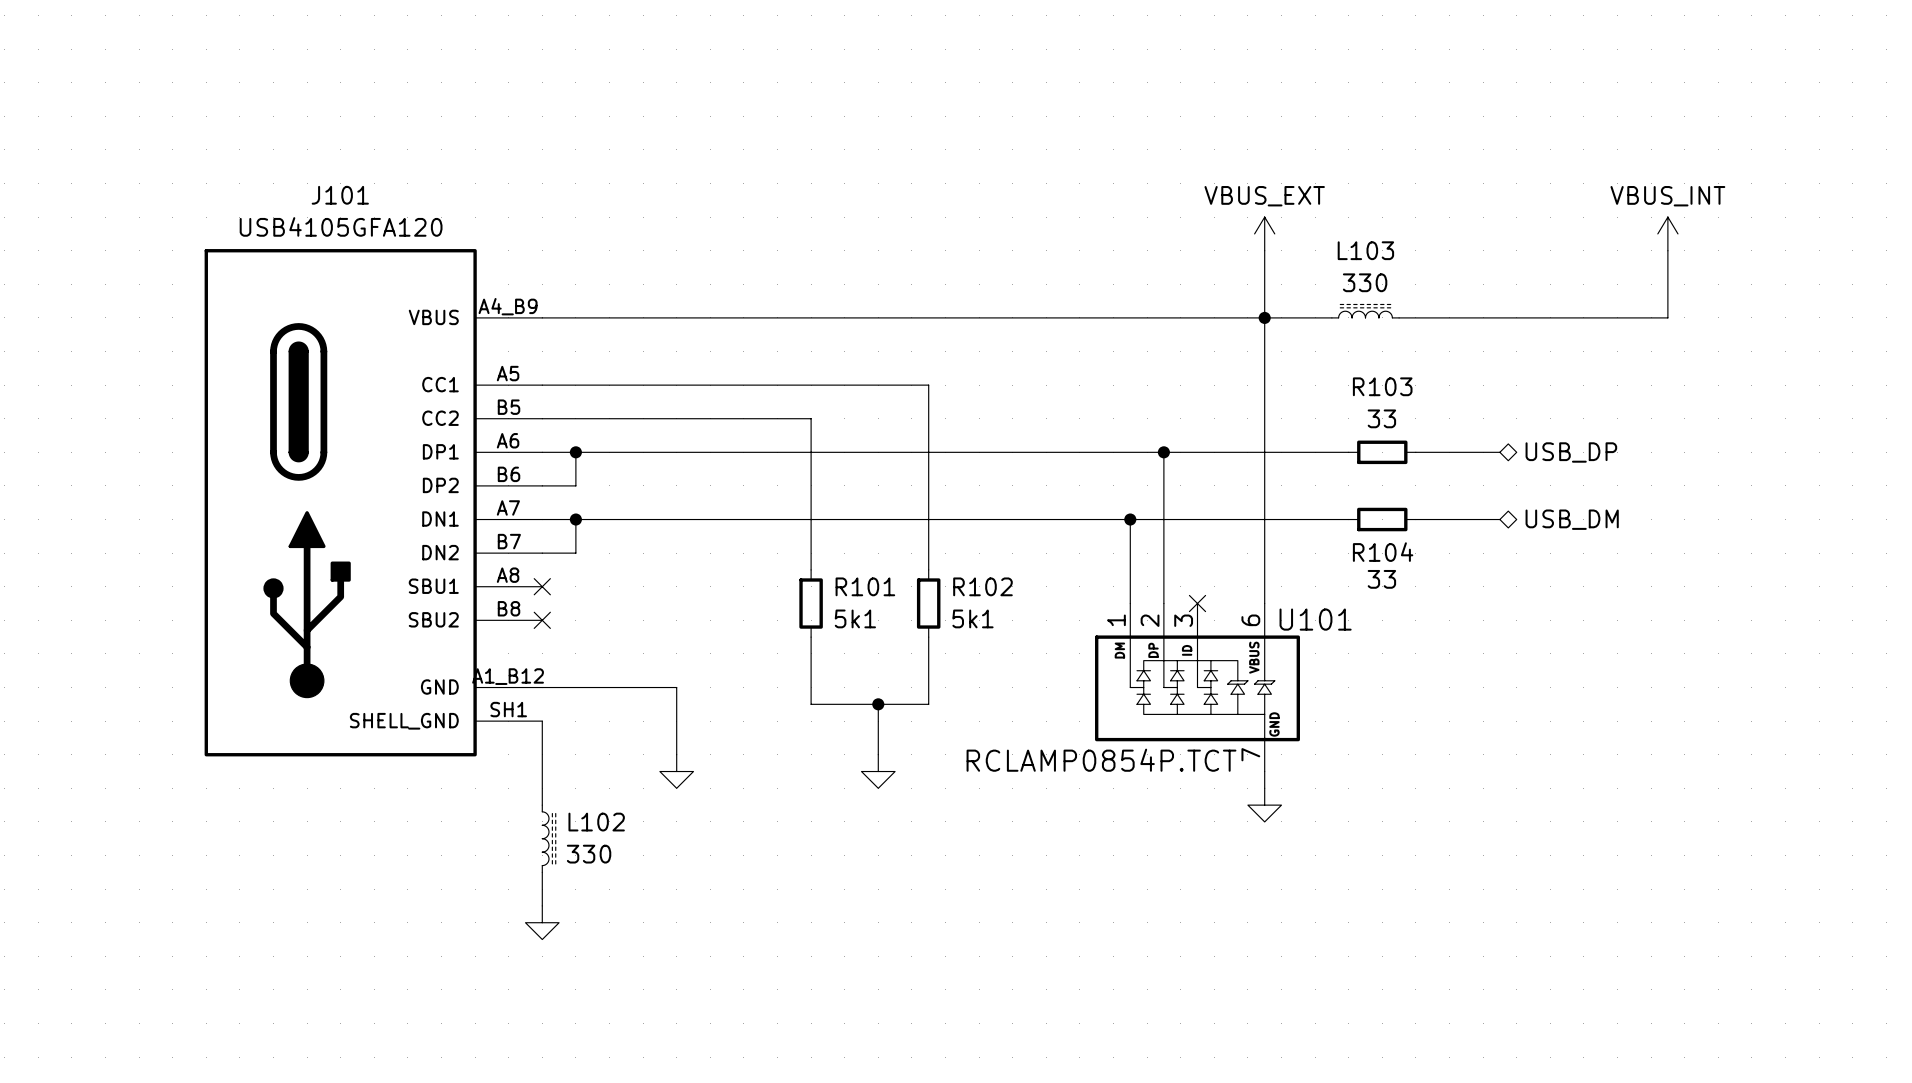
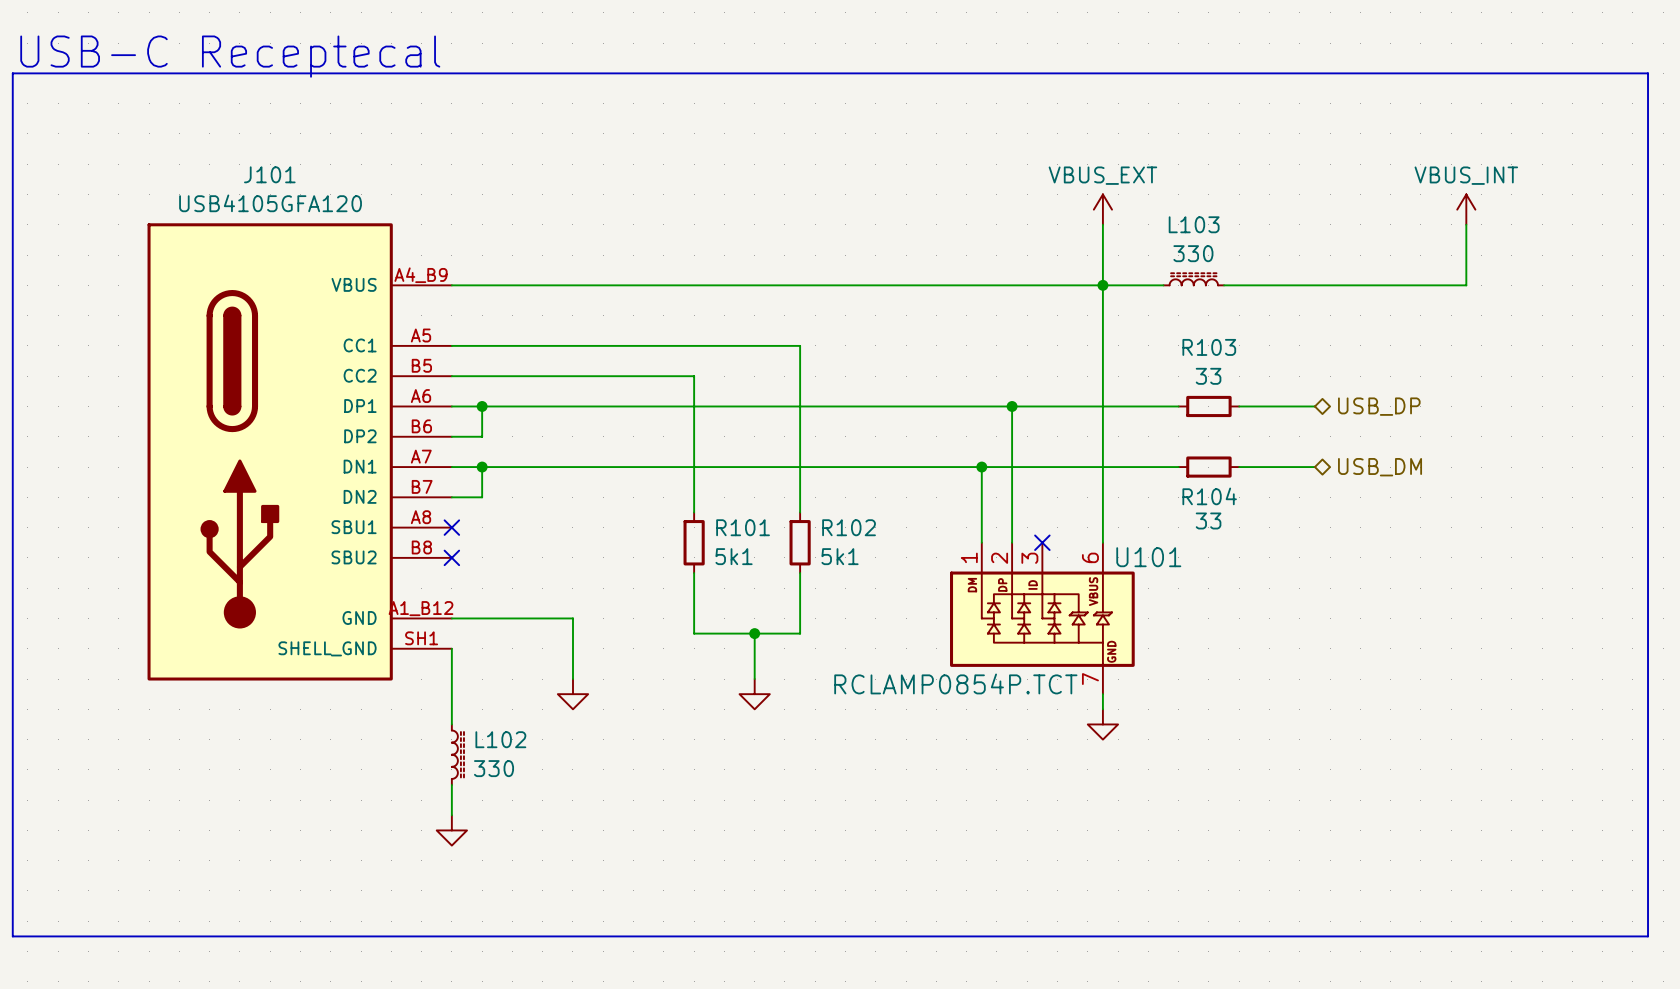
text: none -> USB-C Receptecal (230, 56)
line: none -> (12, 73) (1648, 73) (1648, 936) (12, 936) (12, 73)

